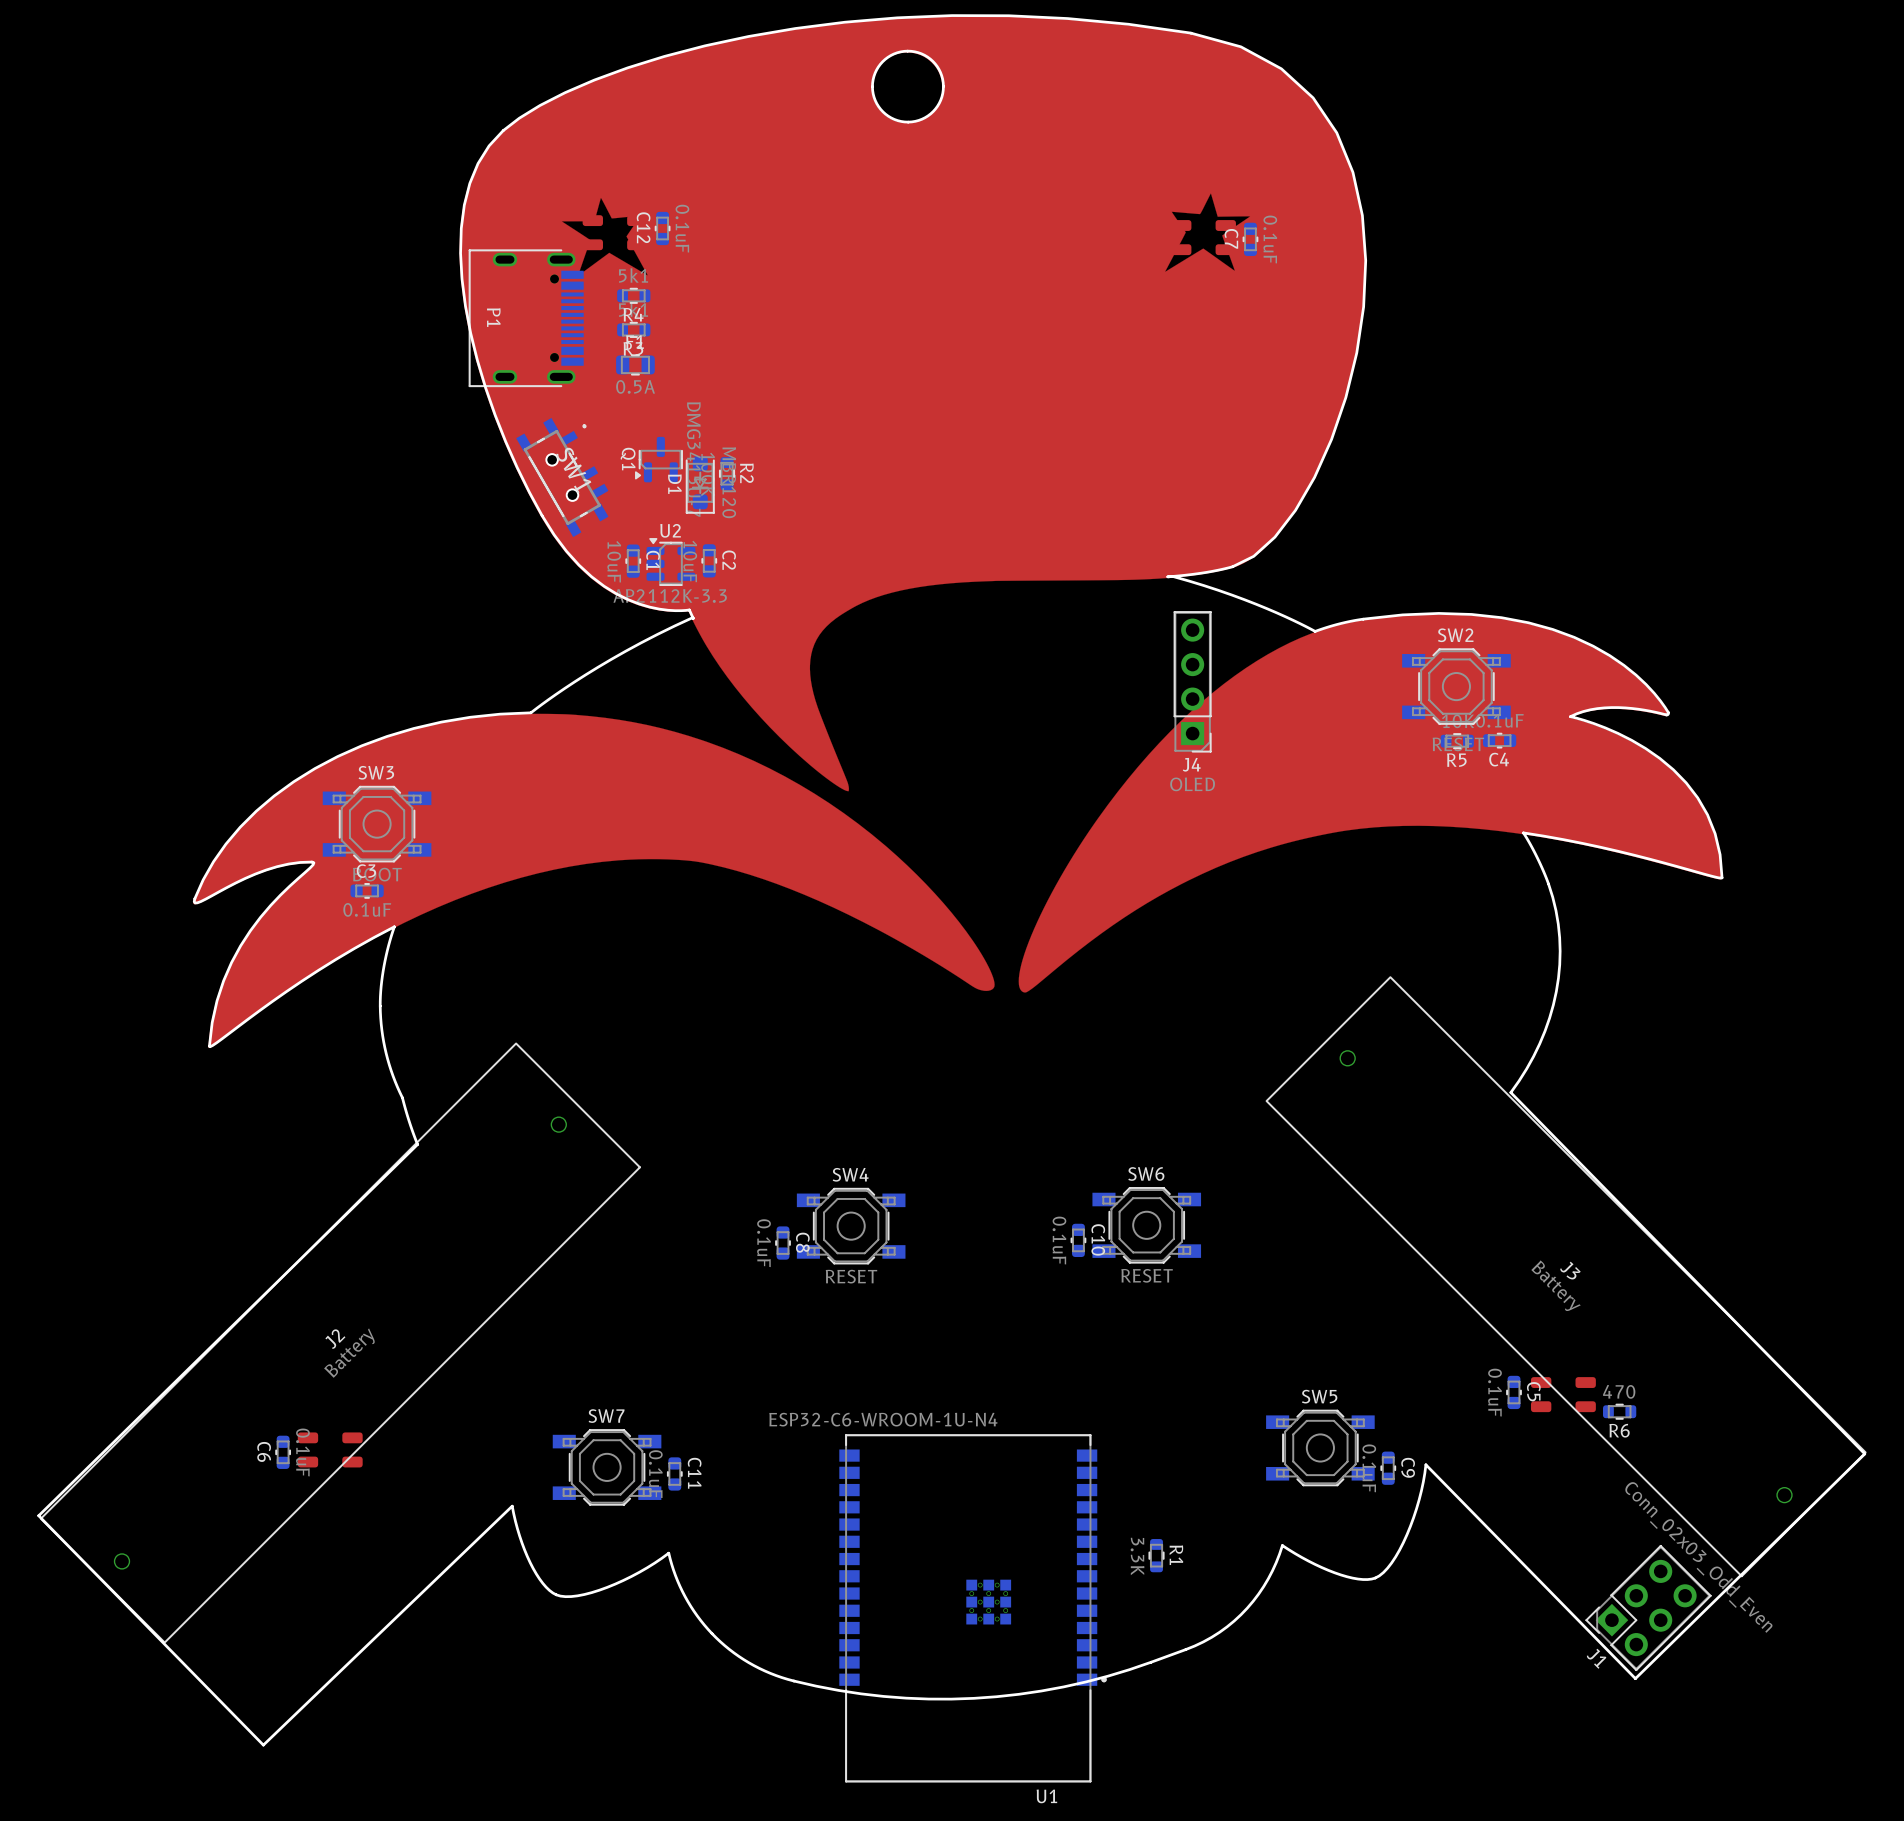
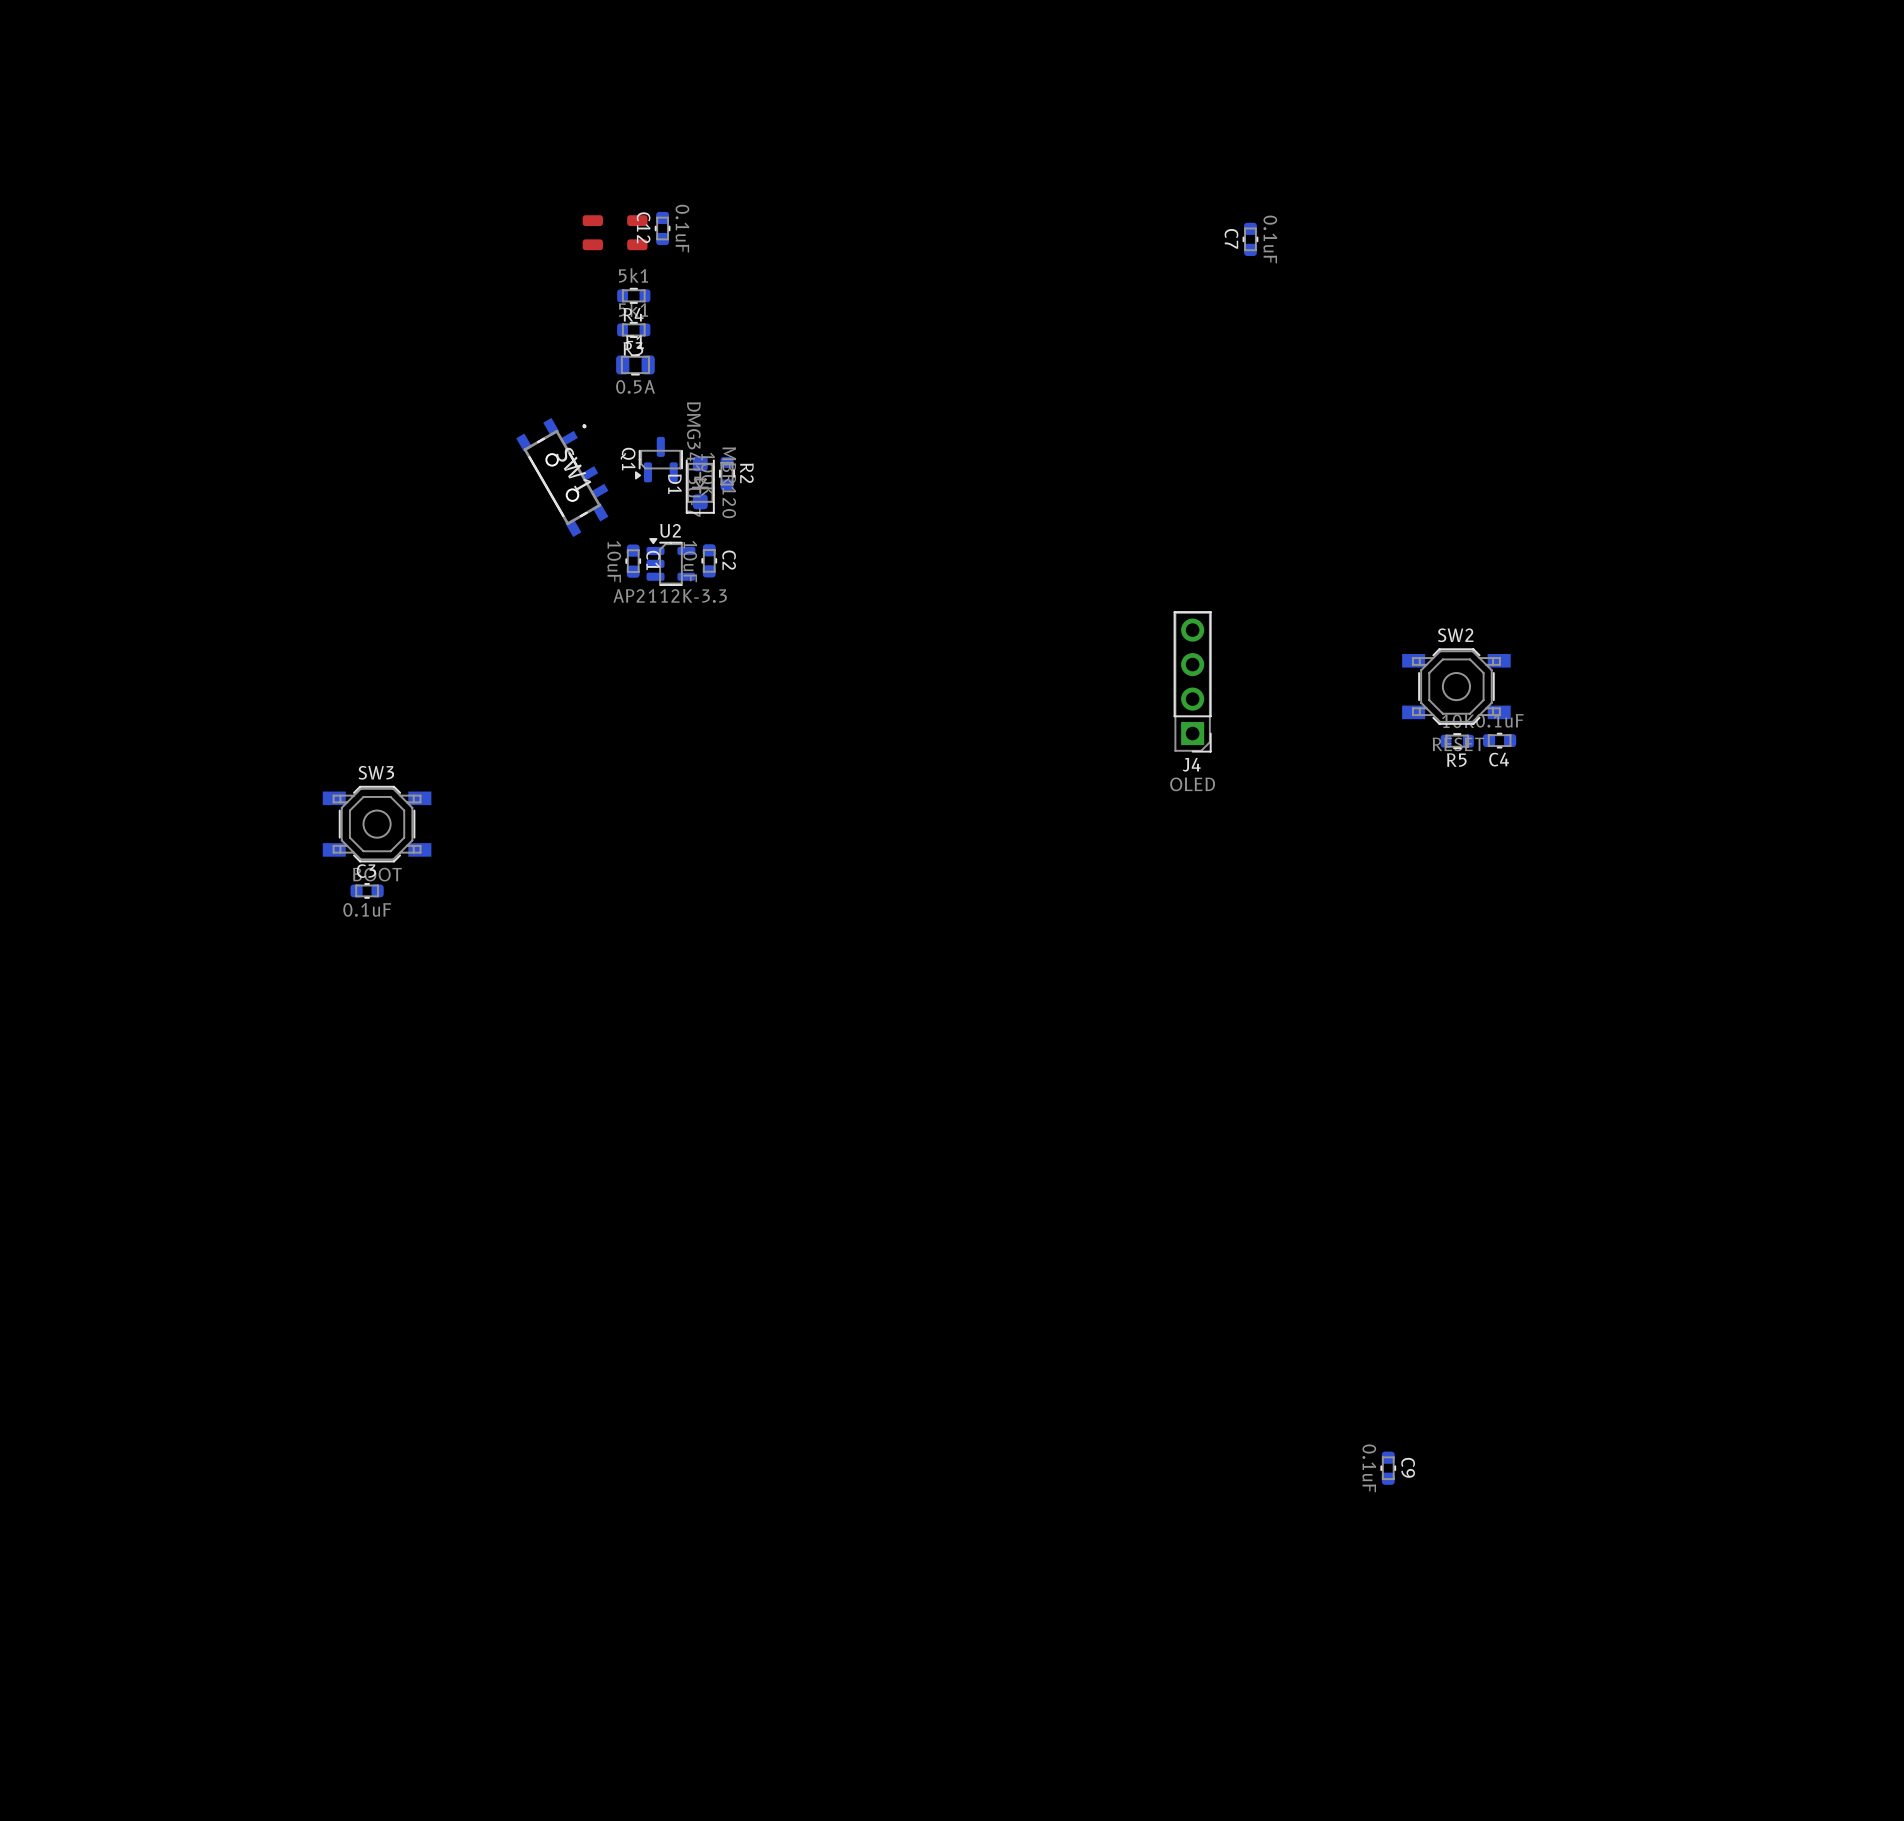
drawing: [193, 16, 1722, 1049] -> none
board edge: (1190, 33) (1240, 46) (1281, 68) (1313, 97) (1336, 132) (1352, 172) (1362, 215) (1365, 260) (1363, 306) (1356, 352) (1345, 397) (1331, 439) (1314, 477) (1295, 510) (1274, 537) (1253, 556) (1225, 568) (1167, 576) (1188, 580) (1244, 599) (1315, 631) (1363, 619) (1438, 613) (1471, 614) (1528, 622) (1574, 637) (1609, 655) (1636, 675) (1660, 700) (1668, 712) (1667, 714) (1638, 709) (1611, 707) (1590, 709) (1570, 716) (1605, 727) (1631, 740) (1659, 758) (1686, 782) (1707, 814) (1715, 833) (1720, 854) (1722, 877) (1600, 847) (1523, 832) (1540, 864) (1552, 897) (1558, 924) (1559, 964) (1556, 991) (1545, 1031) (1533, 1056) (1510, 1092) (1864, 1453) (1635, 1678) (1425, 1464) (1419, 1499) (1407, 1534) (1391, 1562) (1383, 1572) (1375, 1578) (1358, 1579) (1334, 1572) (1308, 1561) (1282, 1545) (1268, 1578) (1253, 1601) (1227, 1626) (1203, 1641) (1129, 1669) (1085, 1681) (1041, 1691) (974, 1698) (906, 1698) (861, 1693) (793, 1681) (759, 1668) (729, 1649) (700, 1620) (679, 1586) (668, 1553) (639, 1572) (607, 1587) (577, 1595) (556, 1594) (542, 1583) (530, 1562) (519, 1535) (512, 1506) (263, 1745) (38, 1515) (417, 1144) (389, 1064) (381, 1023) (380, 1001) (382, 976) (394, 926) (318, 970) (210, 1046) (212, 1022) (217, 1000) (223, 980) (240, 945) (270, 905) (313, 862) (300, 862) (277, 866) (245, 878) (201, 901) (195, 902) (194, 898) (213, 861) (240, 827) (274, 795) (314, 768) (361, 745) (413, 728) (470, 717) (530, 712) (564, 688) (611, 659) (657, 634) (693, 618) (689, 609) (659, 609) (628, 599) (591, 576) (566, 551) (554, 534) (517, 467) (485, 387) (465, 305) (460, 253) (461, 228) (469, 183) (478, 163) (489, 145) (503, 130) (540, 105) (565, 92) (627, 67) (664, 56) (748, 36) (844, 22) (951, 15) (1067, 18) (1190, 33) -> none
board edge: (907, 51) (921, 53) (932, 61) (940, 72) (943, 86) (940, 100) (933, 111) (922, 119) (908, 122) (894, 119) (883, 111) (875, 100) (872, 86) (875, 73) (882, 61) (893, 54) (907, 51) -> none
part: (1203, 237) -> none
P1: (526, 318) -> none
SW6: RESET (1146, 1225) -> none
SW4: RESET (851, 1226) -> none
C10: 0.1uF (1078, 1240) -> none
C8: 0.1uF (783, 1243) -> none
J3: Battery (1566, 1276) -> none
J2: Battery (340, 1343) -> none
C5: 0.1uF (1514, 1392) -> none
part: (1563, 1394) -> none
R6: 470 (1619, 1411) -> none
SW5: (1320, 1447) -> none
part: (330, 1449) -> none
C6: 0.1uF (283, 1452) -> none
SW7: (607, 1467) -> none
C11: 0.1uF (674, 1473) -> none
R1: 3.3K (1156, 1555) -> none
J1: Conn_02x03_Odd_Even (1648, 1607) -> none
U1: ESP32-C6-WROOM-1U-N4 (973, 1608) -> none

